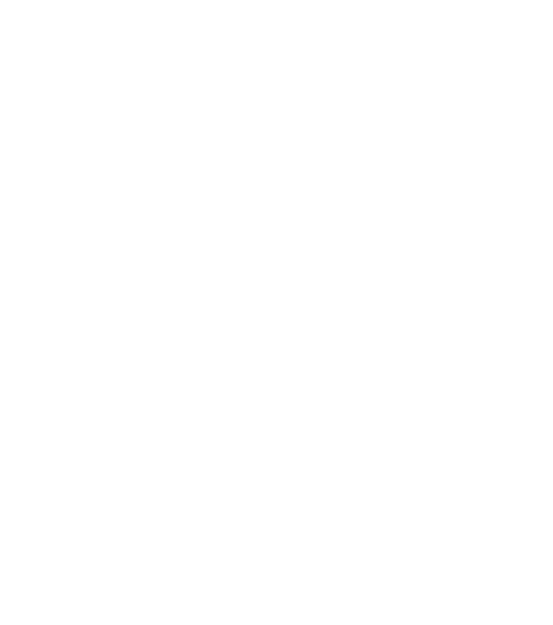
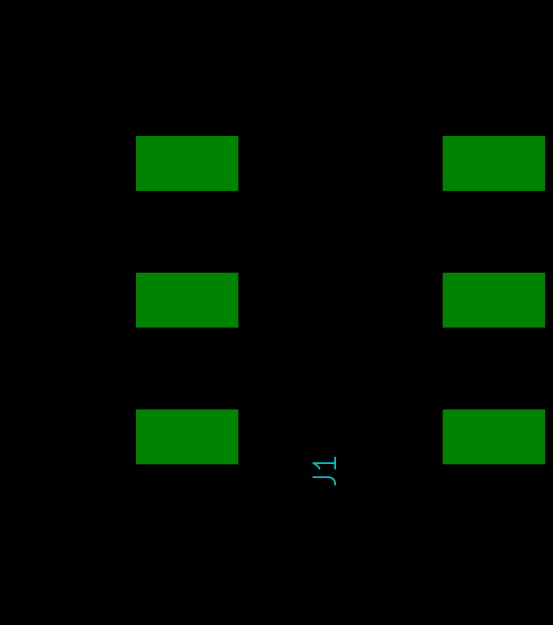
J1: none -> (340, 300)

